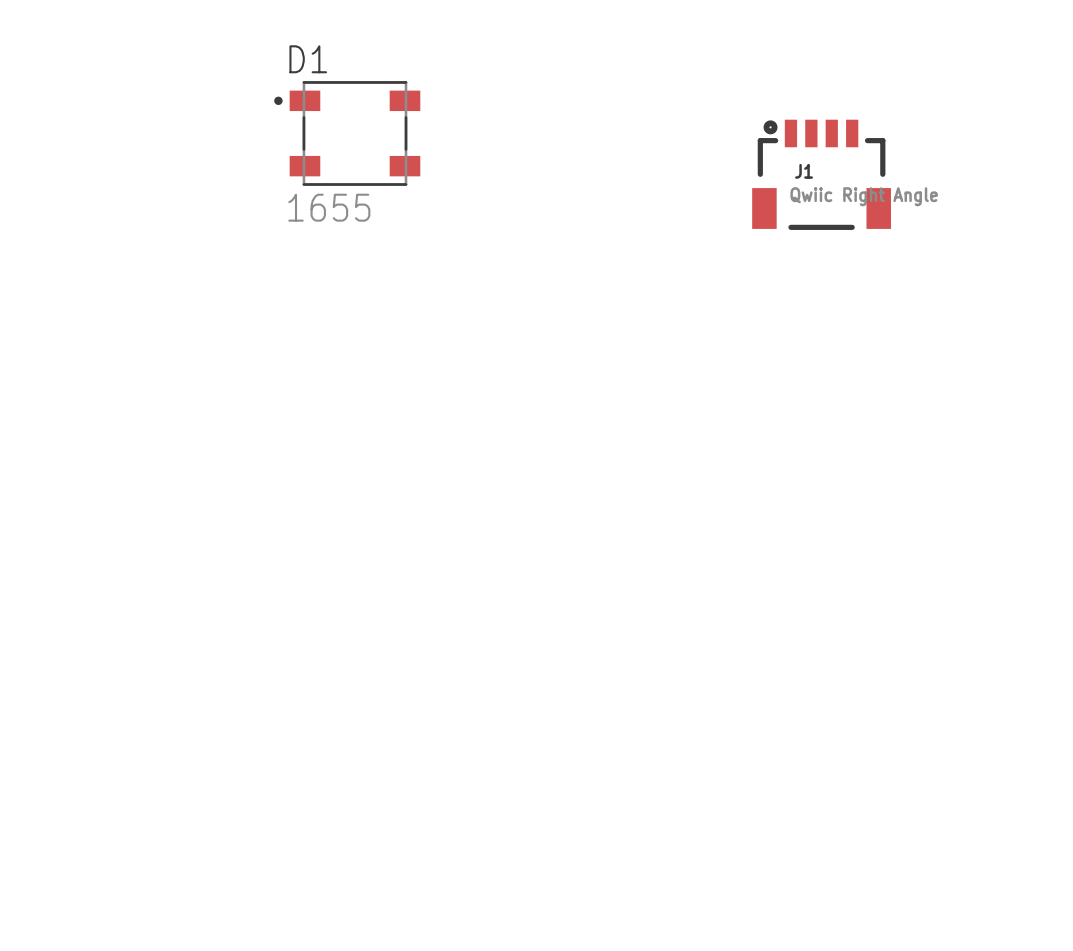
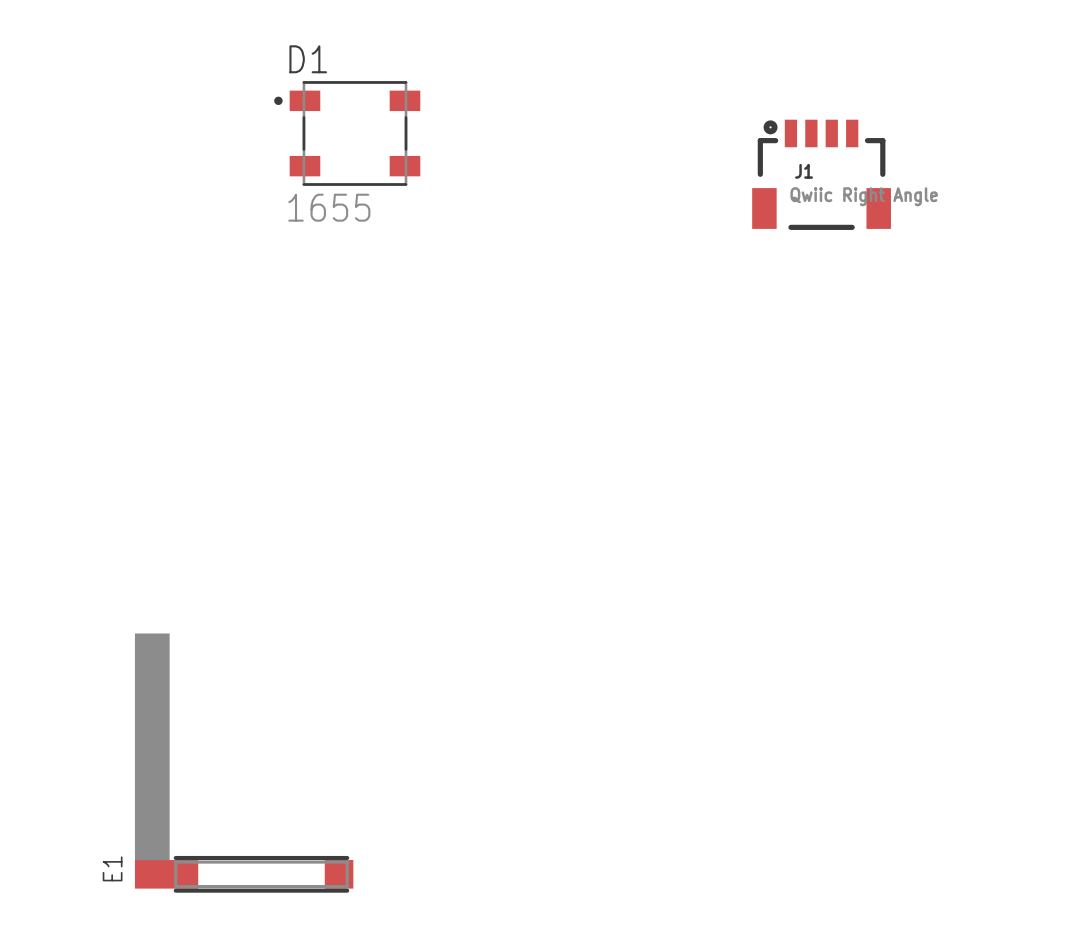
E1: none -> (244, 763)

